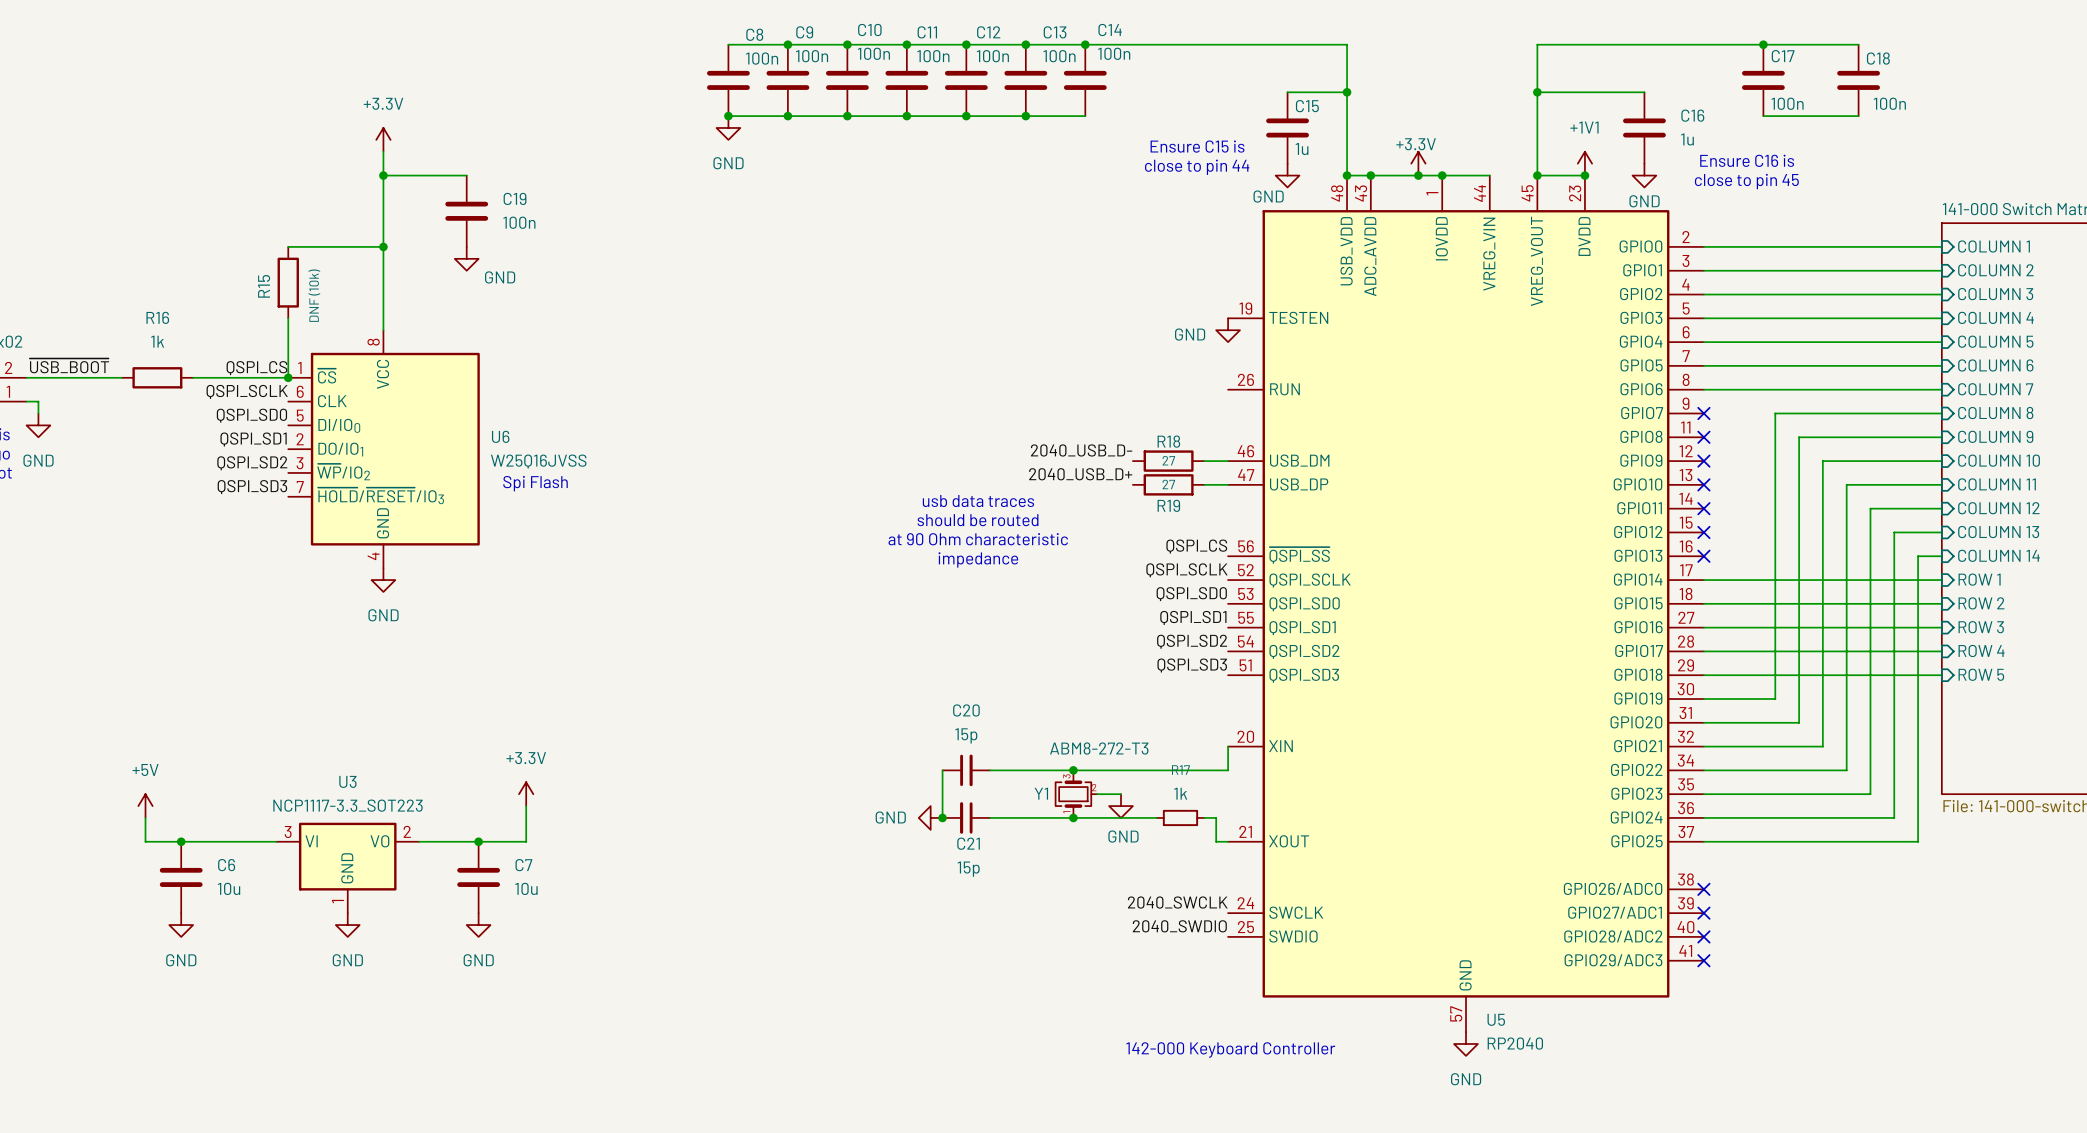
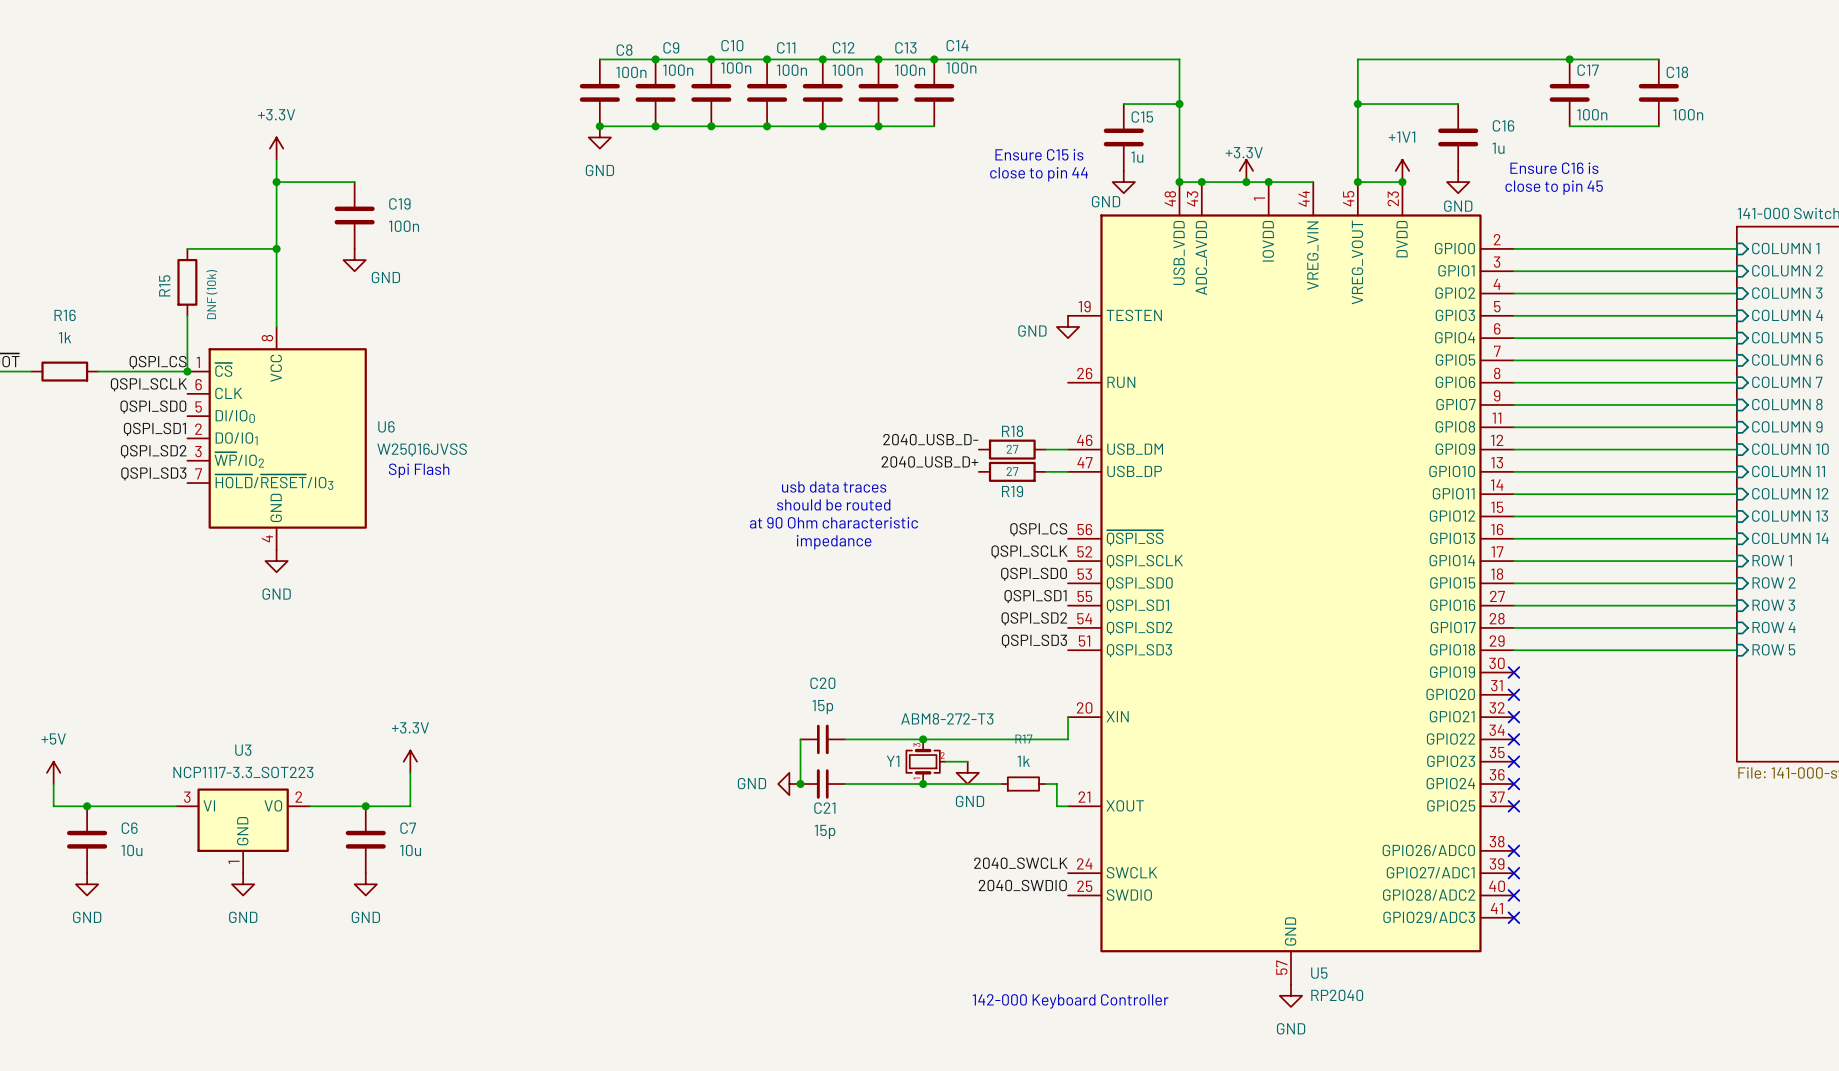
no-connect mark: (1703, 413) -> none
wire: (1775, 413) (1775, 699) (1703, 699) -> (1580, 405) (1513, 405)
no-connect mark: (1703, 437) -> none
wire: (1799, 437) (1799, 722) (1703, 722) -> (1603, 427) (1513, 427)
no-connect mark: (1703, 461) -> none
wire: (1822, 461) (1822, 746) (1703, 746) -> (1625, 449) (1513, 449)
no-connect mark: (1703, 484) -> none
wire: (1846, 484) (1846, 770) (1703, 770) -> (1647, 471) (1513, 471)
no-connect mark: (1703, 508) -> none
wire: (1870, 508) (1870, 794) (1703, 794) -> (1669, 494) (1513, 494)
no-connect mark: (1703, 532) -> none
wire: (1894, 532) (1894, 817) (1703, 817) -> (1692, 516) (1513, 516)
no-connect mark: (1703, 556) -> none
wire: (1918, 556) (1918, 841) (1703, 841) -> (1714, 538) (1513, 538)
no-connect mark: none -> (1513, 672)
no-connect mark: none -> (1513, 694)
no-connect mark: none -> (1513, 717)
no-connect mark: none -> (1513, 739)
no-connect mark: none -> (1513, 761)
no-connect mark: none -> (1513, 784)
no-connect mark: none -> (1513, 806)

